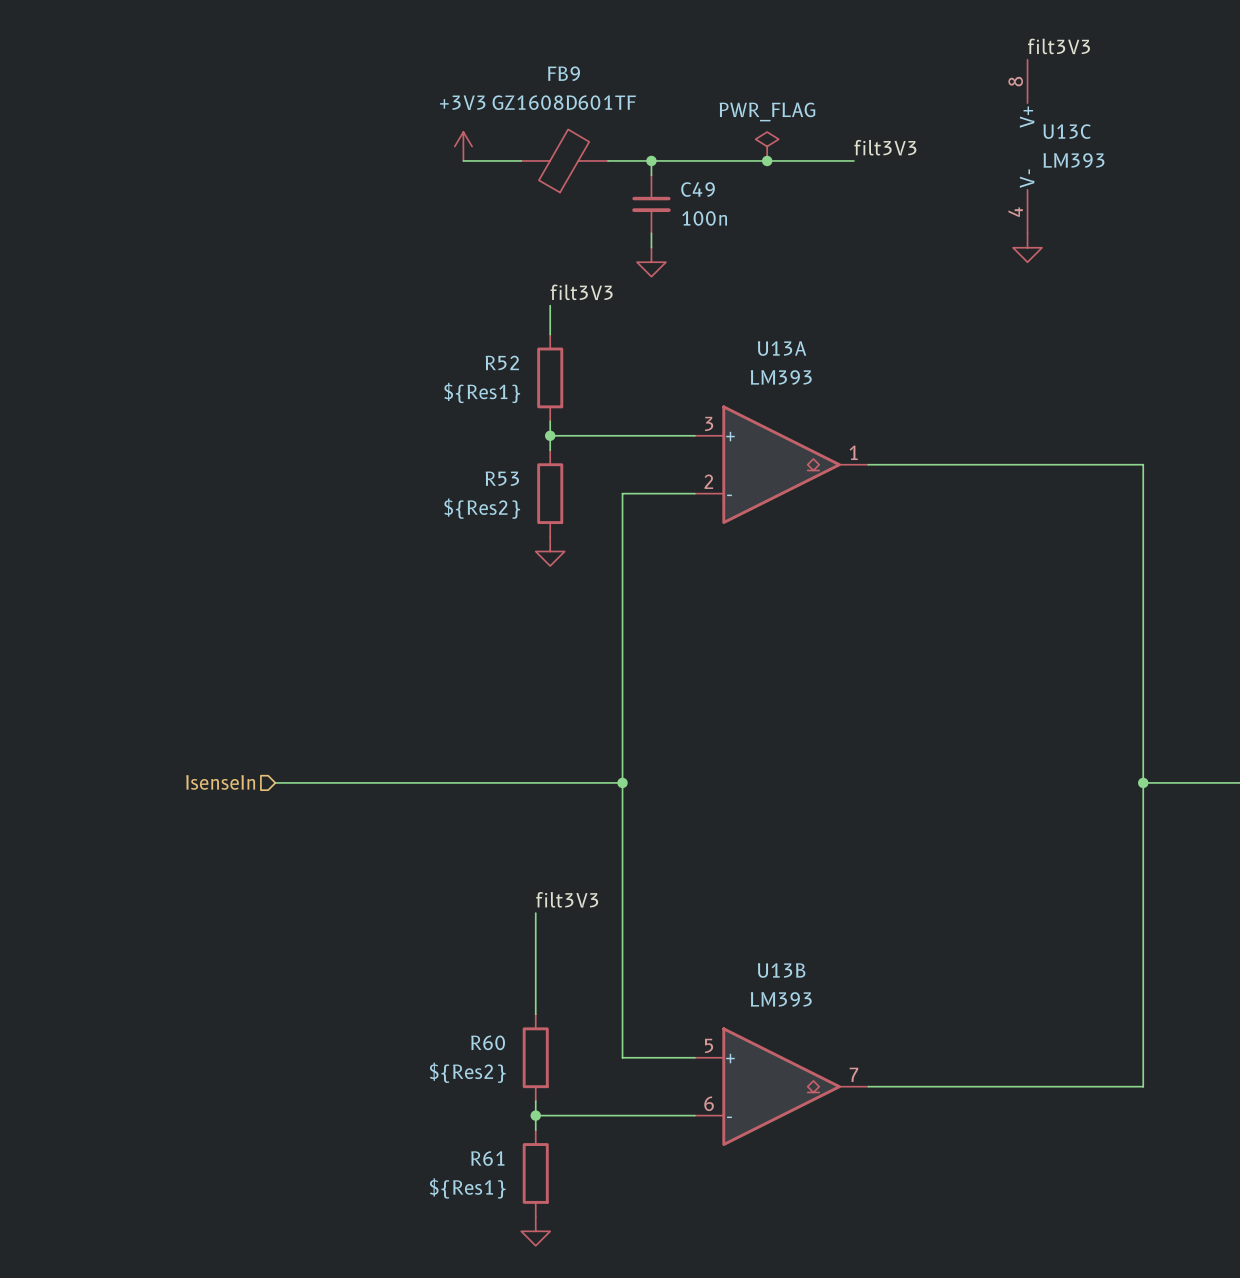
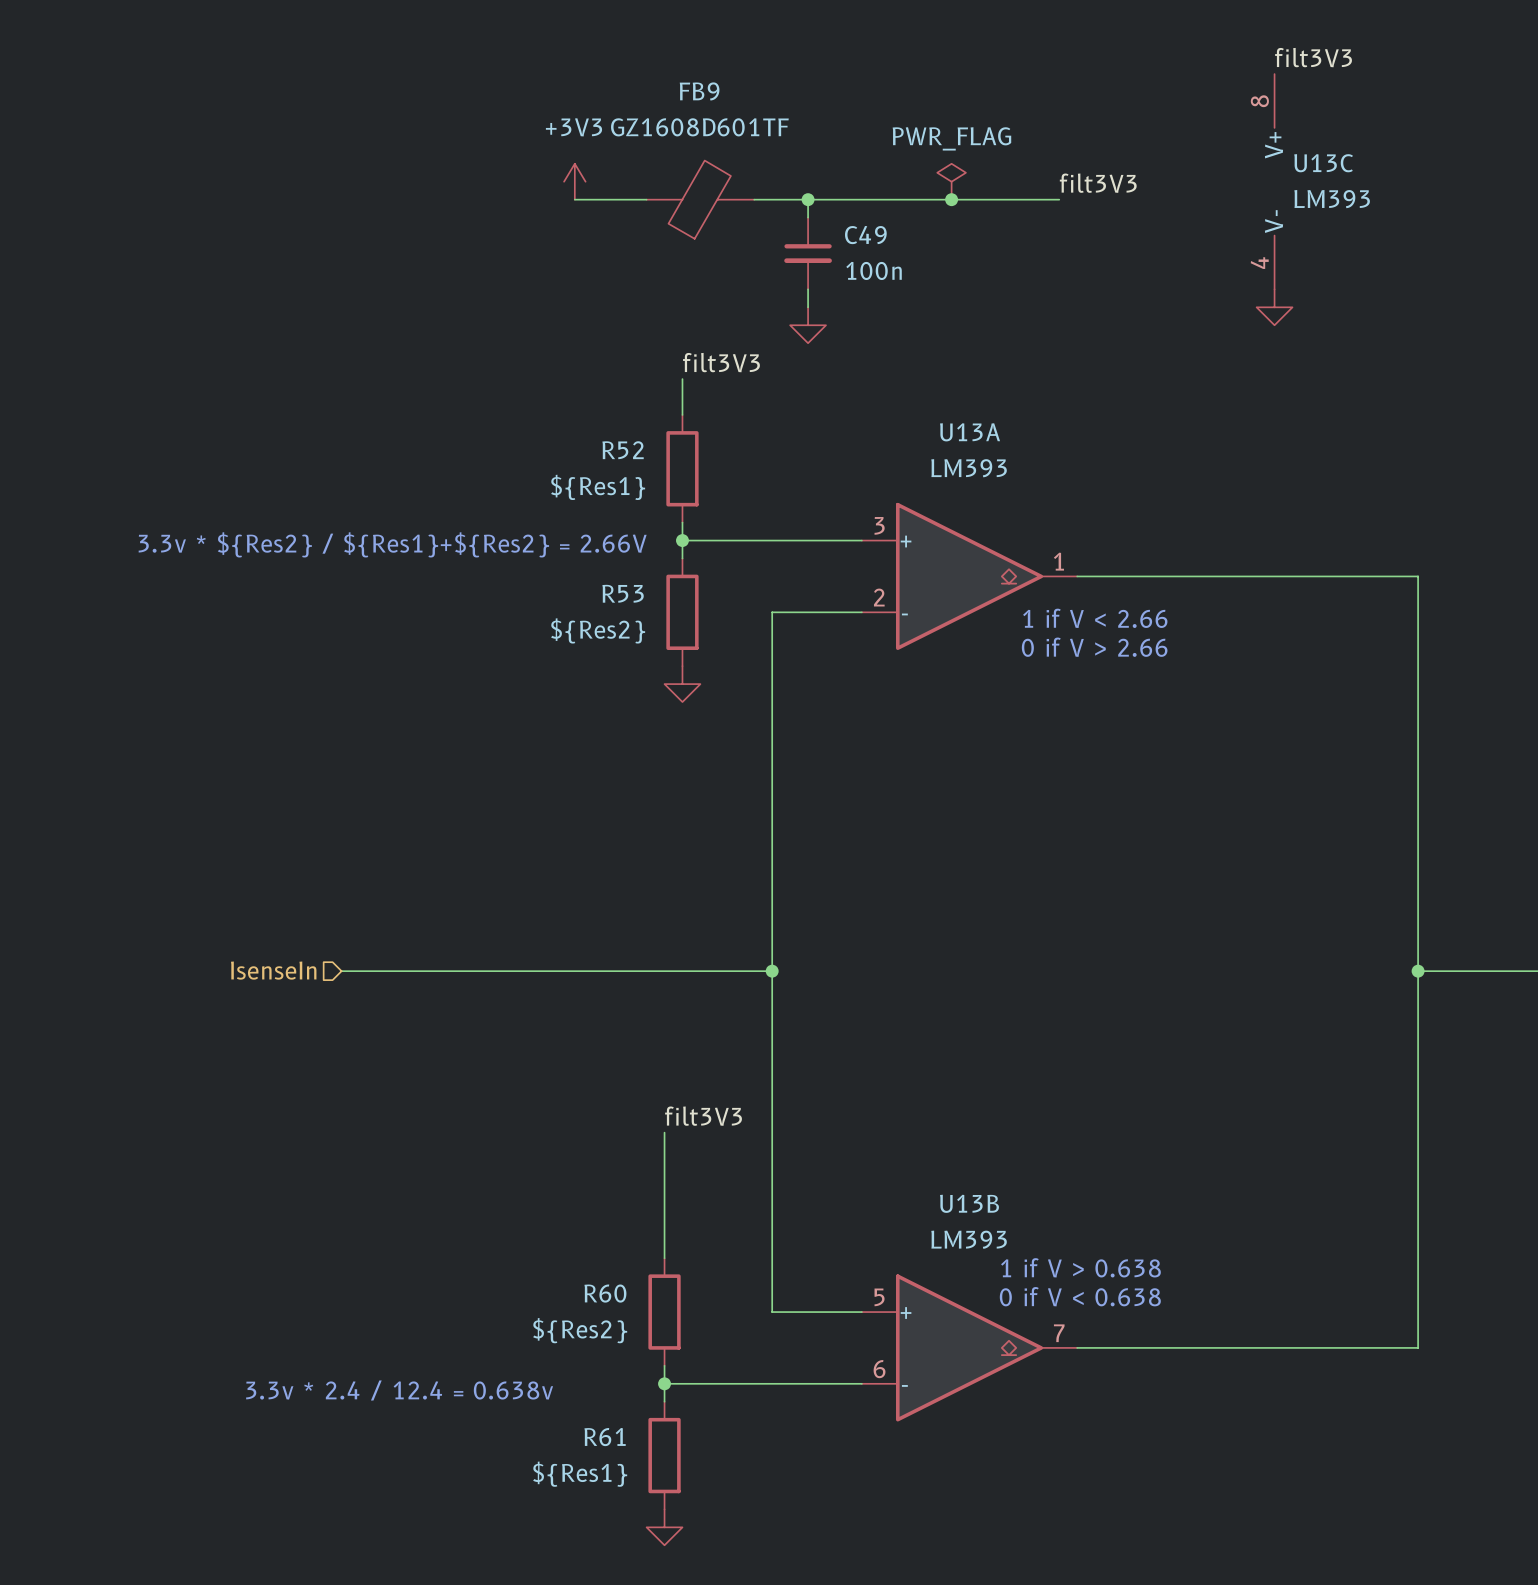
text: none -> 3.3v * ${Res2} / ${Res1}+${Res2} = 2.66V (392, 544)
text: none -> 1 if V < 2.66 (1095, 618)
text: none -> 0 if V > 2.66 (1094, 647)
text: none -> 1 if V > 0.638 (1080, 1267)
text: none -> 0 if V < 0.638 (1080, 1296)
text: none -> 3.3v * 2.4 / 12.4 = 0.638v (399, 1390)

